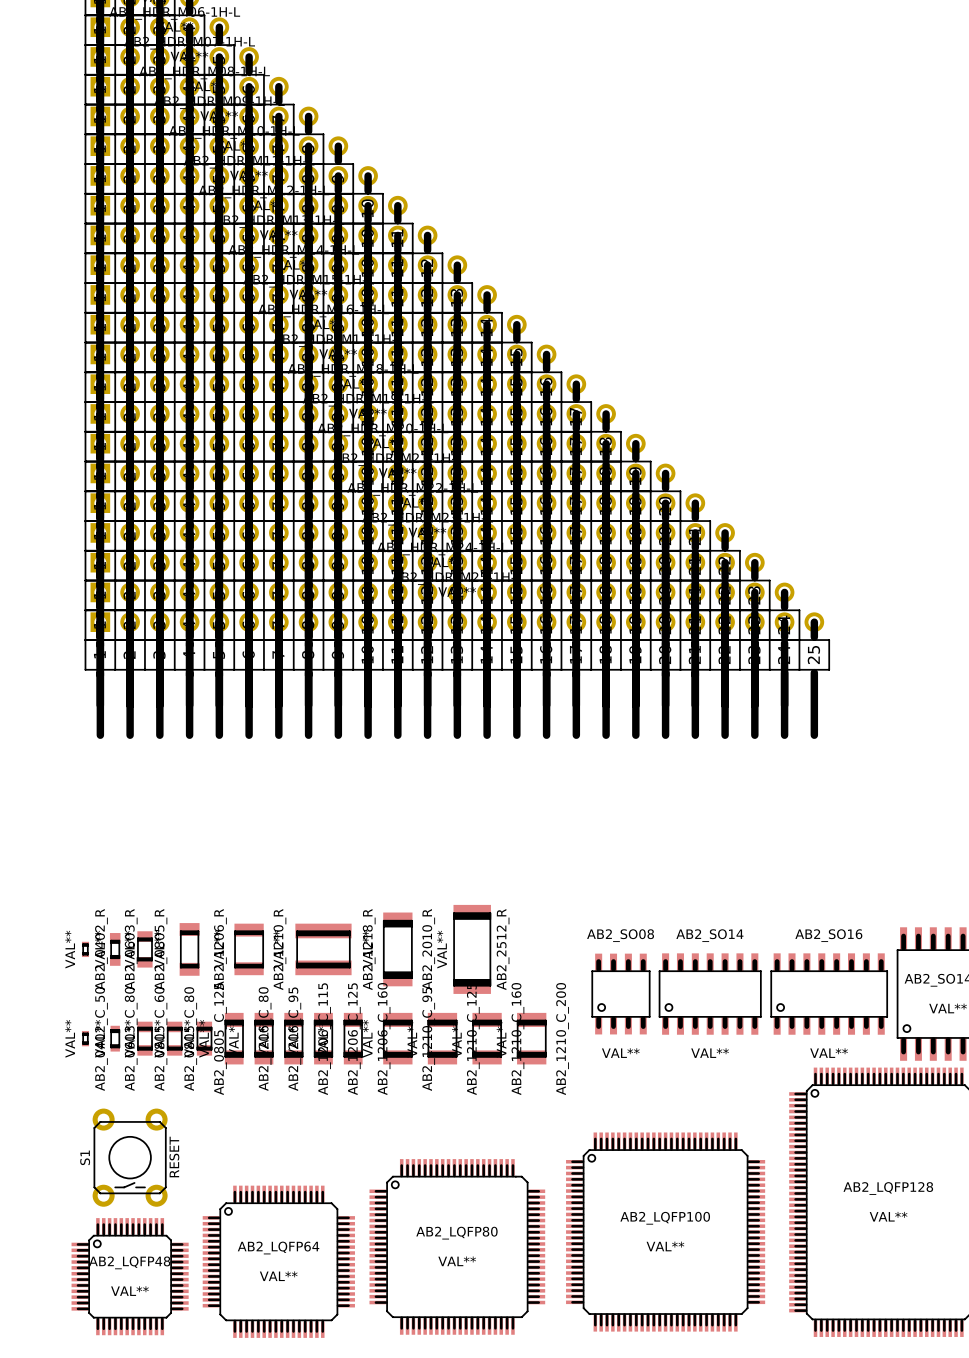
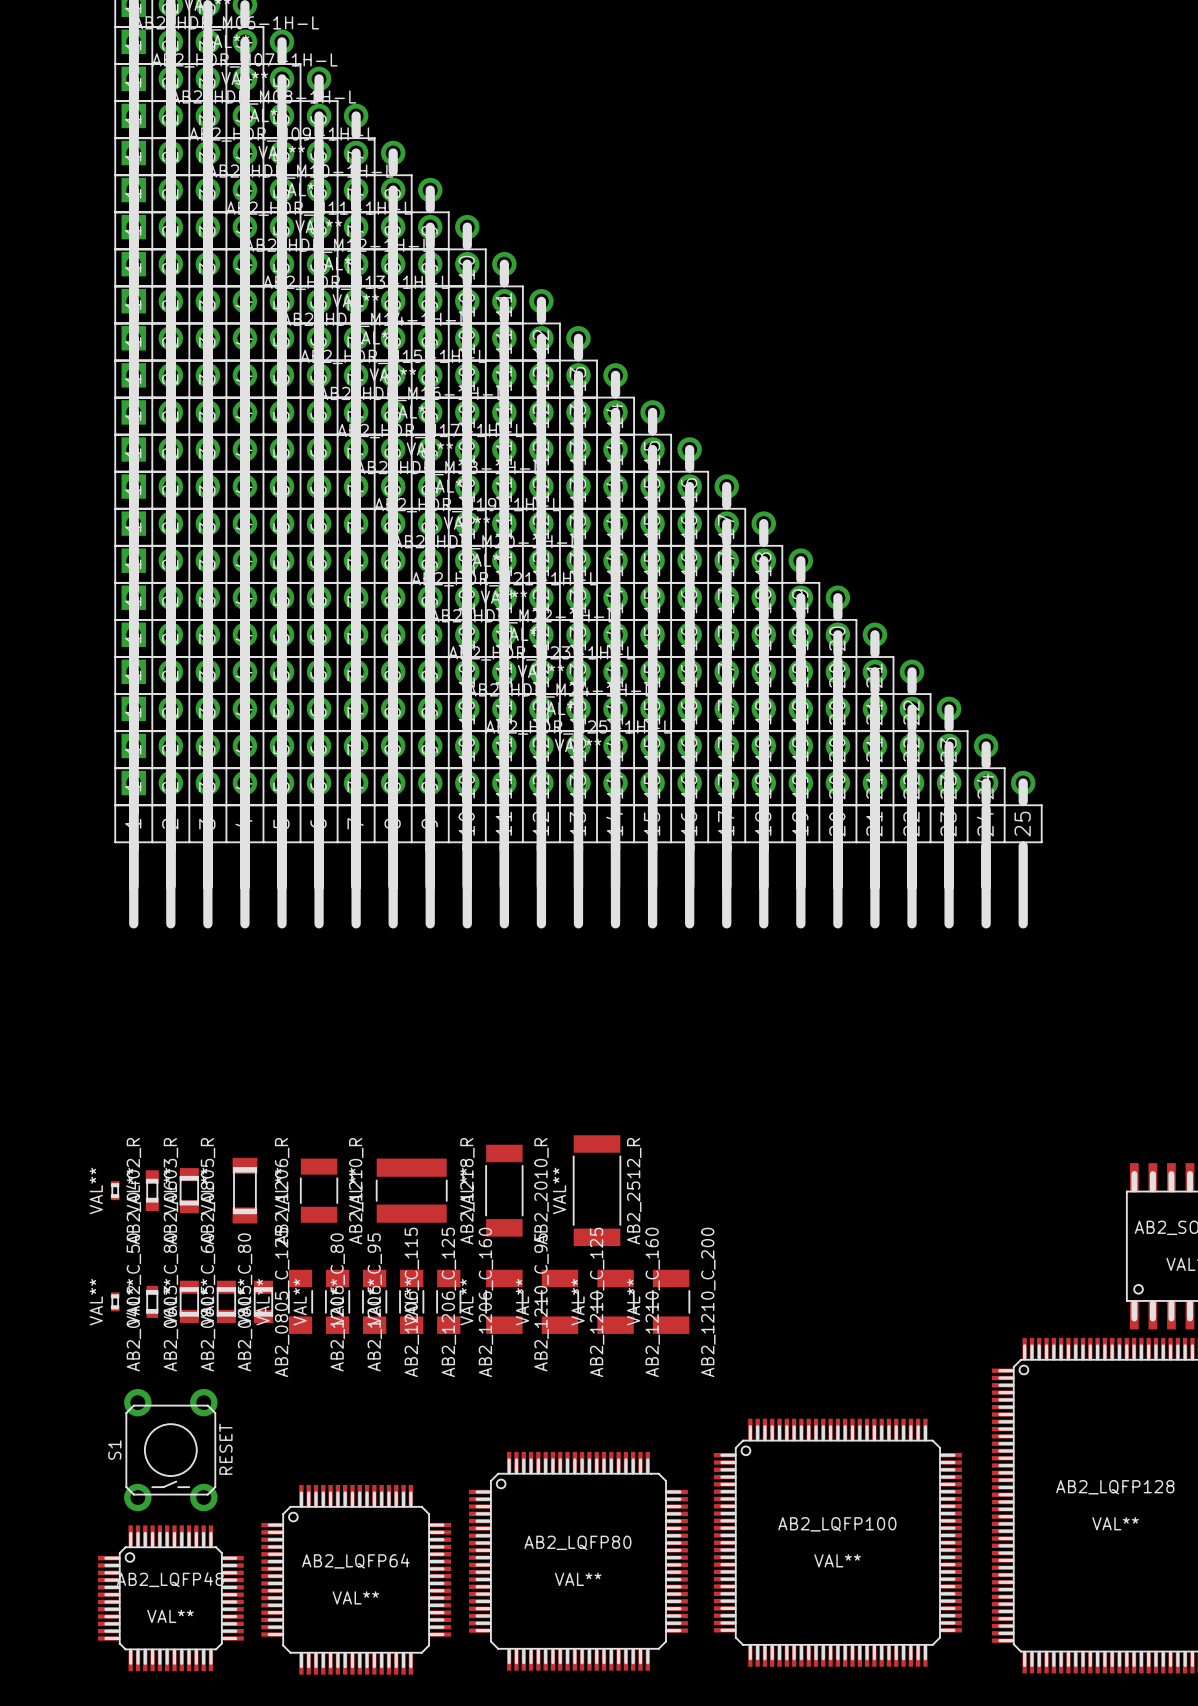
AB2_2512_R footprint: [453, 904, 492, 994] -> [572, 1135, 622, 1247]
AB2_2010_R footprint: [383, 912, 413, 987] -> [485, 1144, 524, 1237]
AB2_1210_R footprint: [234, 923, 264, 976] -> [299, 1158, 339, 1223]
AB2_1218_R footprint: [295, 923, 352, 976] -> [375, 1158, 448, 1223]
AB2_SO08: VAL** (620, 994) -> none
AB2_SO14: VAL** (710, 994) -> none
AB2_SO16: VAL** (829, 994) -> none
AB2_1206_C_80 footprint: [224, 1012, 244, 1065] -> [287, 1269, 314, 1334]
AB2_1206_C_95 footprint: [254, 1012, 274, 1065] -> [324, 1269, 351, 1334]
AB2_1206_C_115 footprint: [284, 1012, 304, 1065] -> [362, 1269, 388, 1334]
AB2_1206_C_125 footprint: [313, 1012, 334, 1065] -> [399, 1269, 425, 1334]
AB2_1206_C_160 footprint: [343, 1012, 363, 1065] -> [436, 1269, 462, 1334]
AB2_1210_C_95 footprint: [383, 1012, 413, 1065] -> [485, 1269, 524, 1334]
AB2_1210_C_125 footprint: [427, 1012, 458, 1065] -> [540, 1269, 580, 1334]
AB2_1210_C_160 footprint: [472, 1012, 502, 1065] -> [596, 1269, 635, 1334]
AB2_1210_C_200 footprint: [516, 1012, 547, 1065] -> [651, 1269, 691, 1334]

